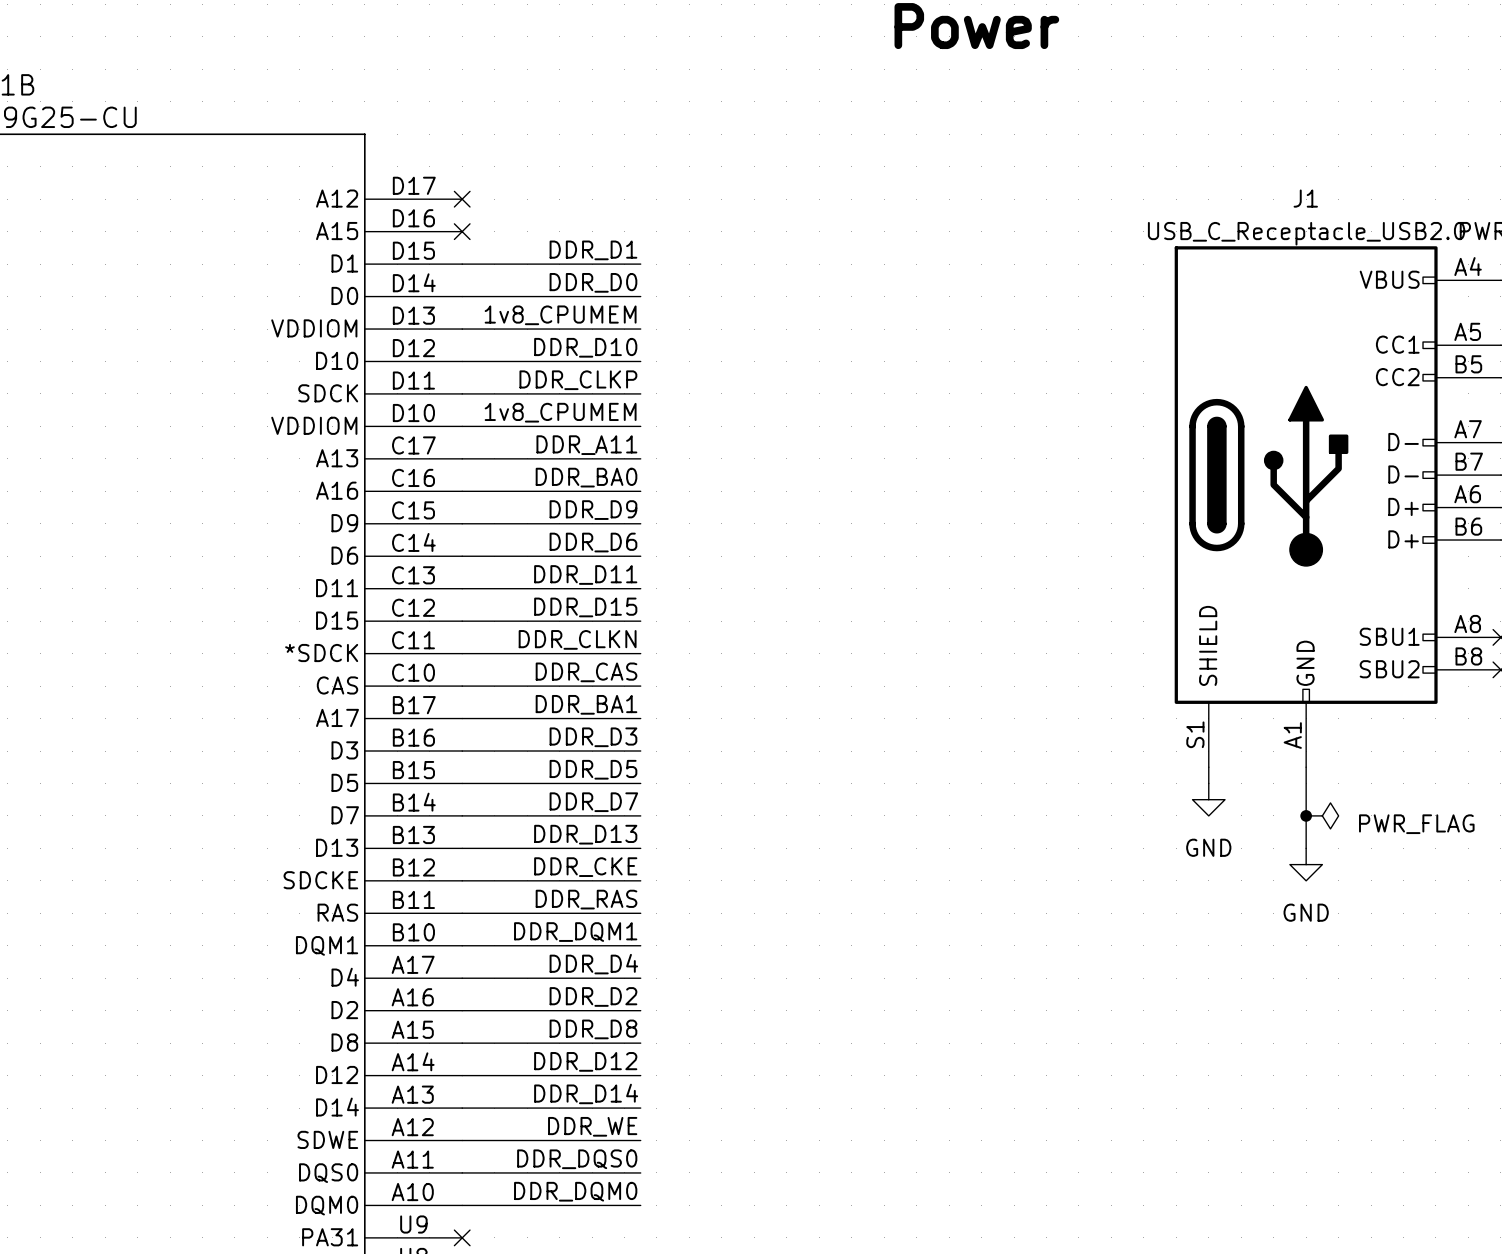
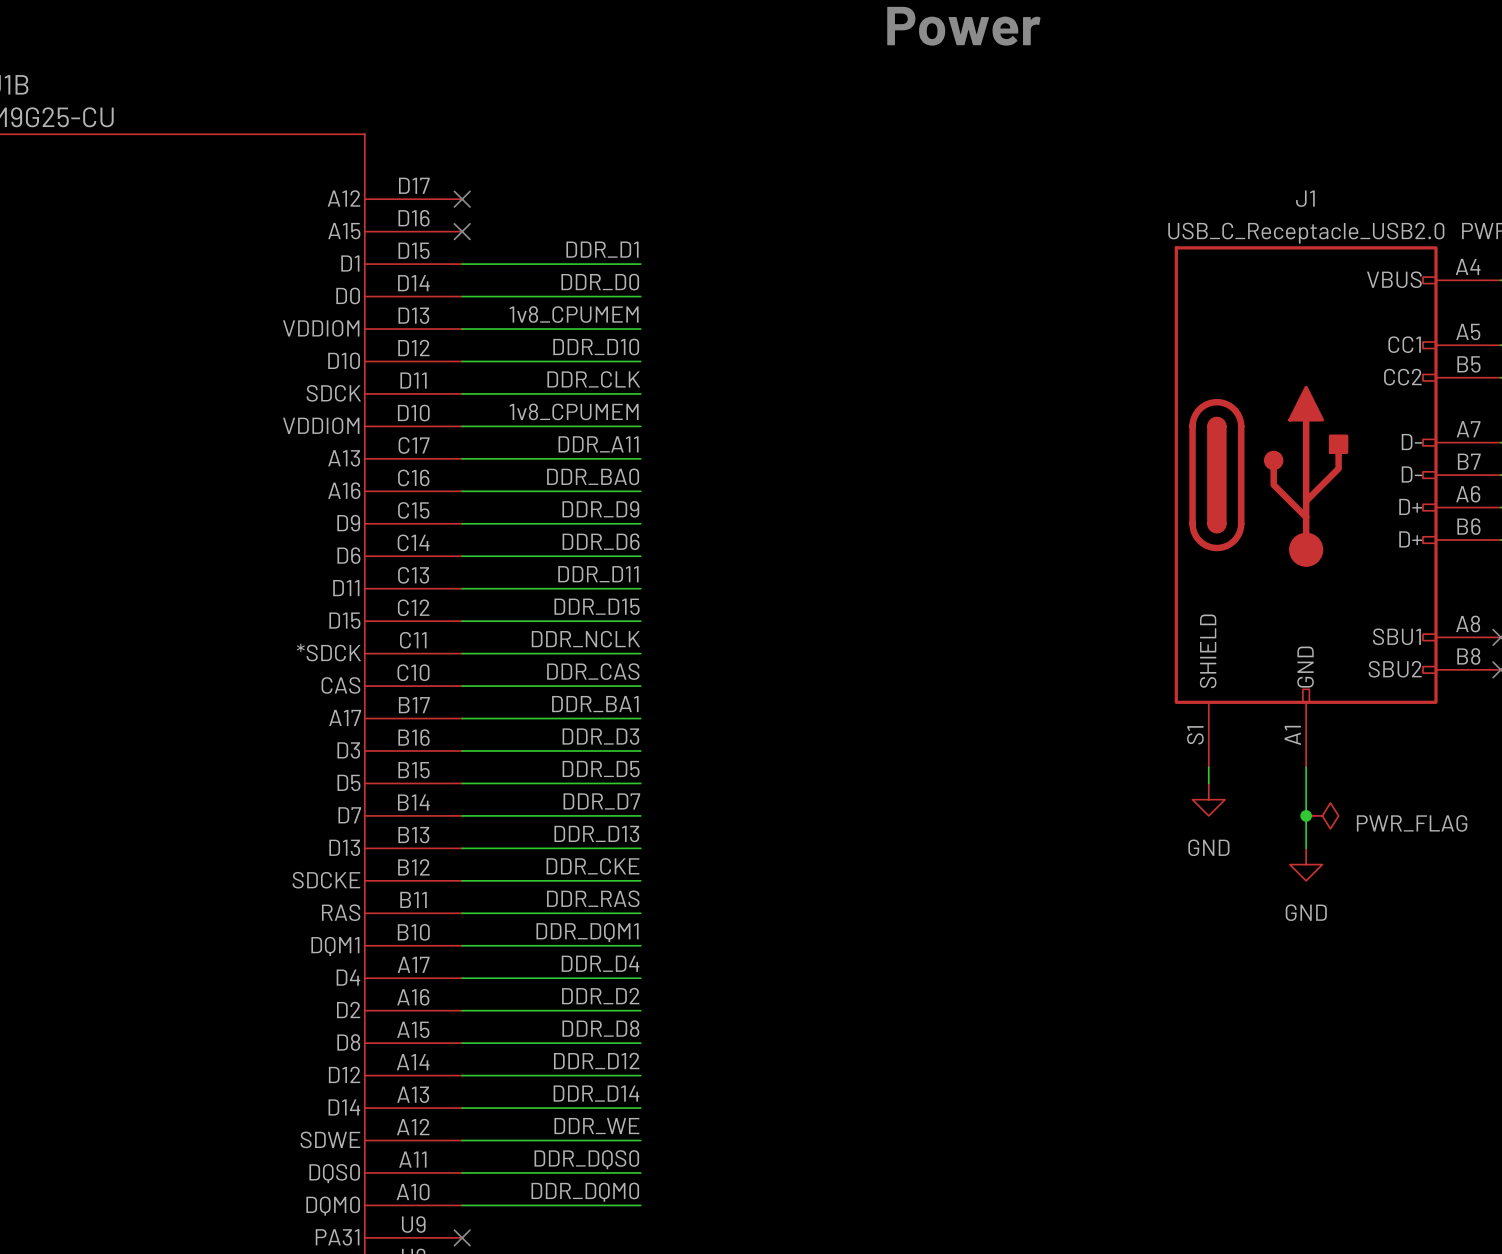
label: DDR_CLKP (578, 380) -> DDR_CLK (593, 379)
label: DDR_CLKN (577, 639) -> DDR_NCLK (585, 639)

